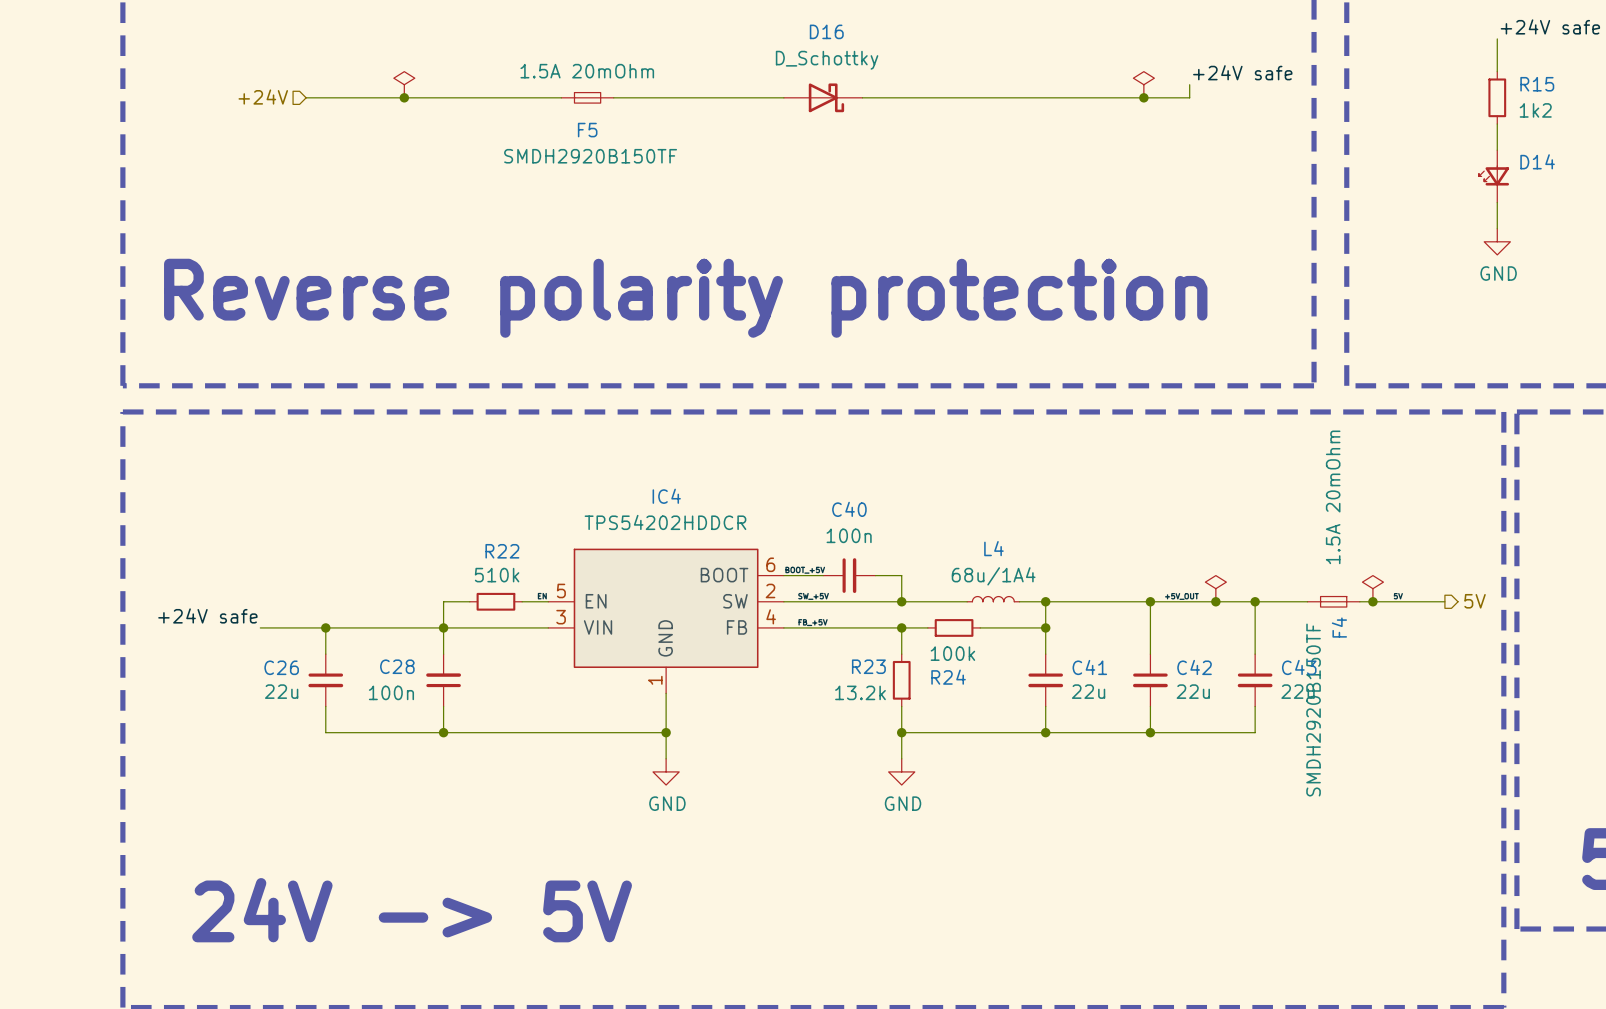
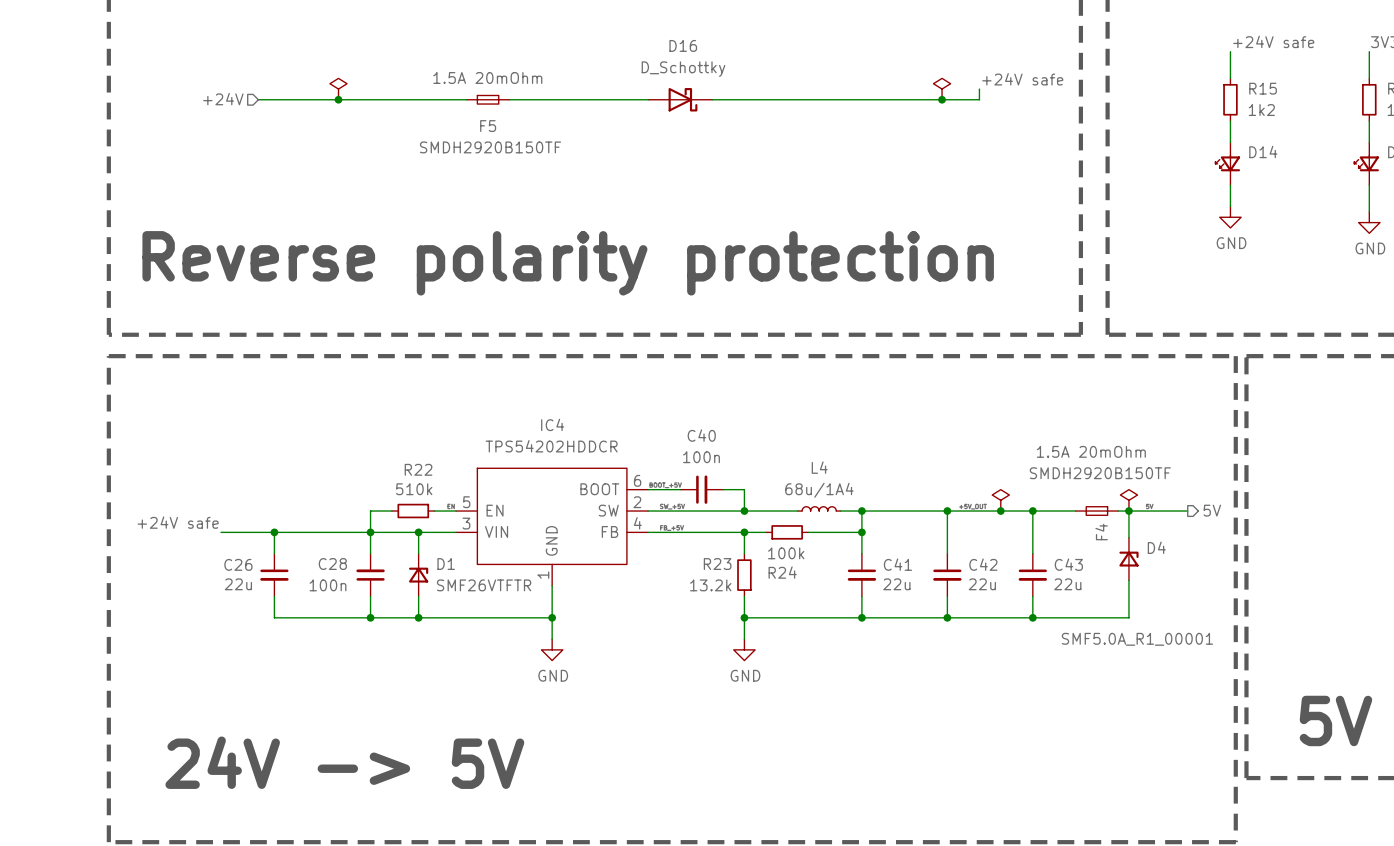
F4 text rotation: 0° (1333, 497) -> 90° clockwise (1091, 451)
wire: none -> (1128, 511) (1128, 537)
wire: none -> (418, 532) (418, 553)
junction: none -> (418, 532)
D4: none -> SMF5.0A_R1_00001 (1128, 559)
D1: none -> SMF26VTFTR (418, 575)
wire: none -> (1128, 580) (1128, 617) (1032, 617)
wire: none -> (418, 596) (418, 617)
F4 value rotation: 0° (1313, 710) -> 90° clockwise (1100, 473)
junction: none -> (418, 617)
junction: none -> (1032, 617)

